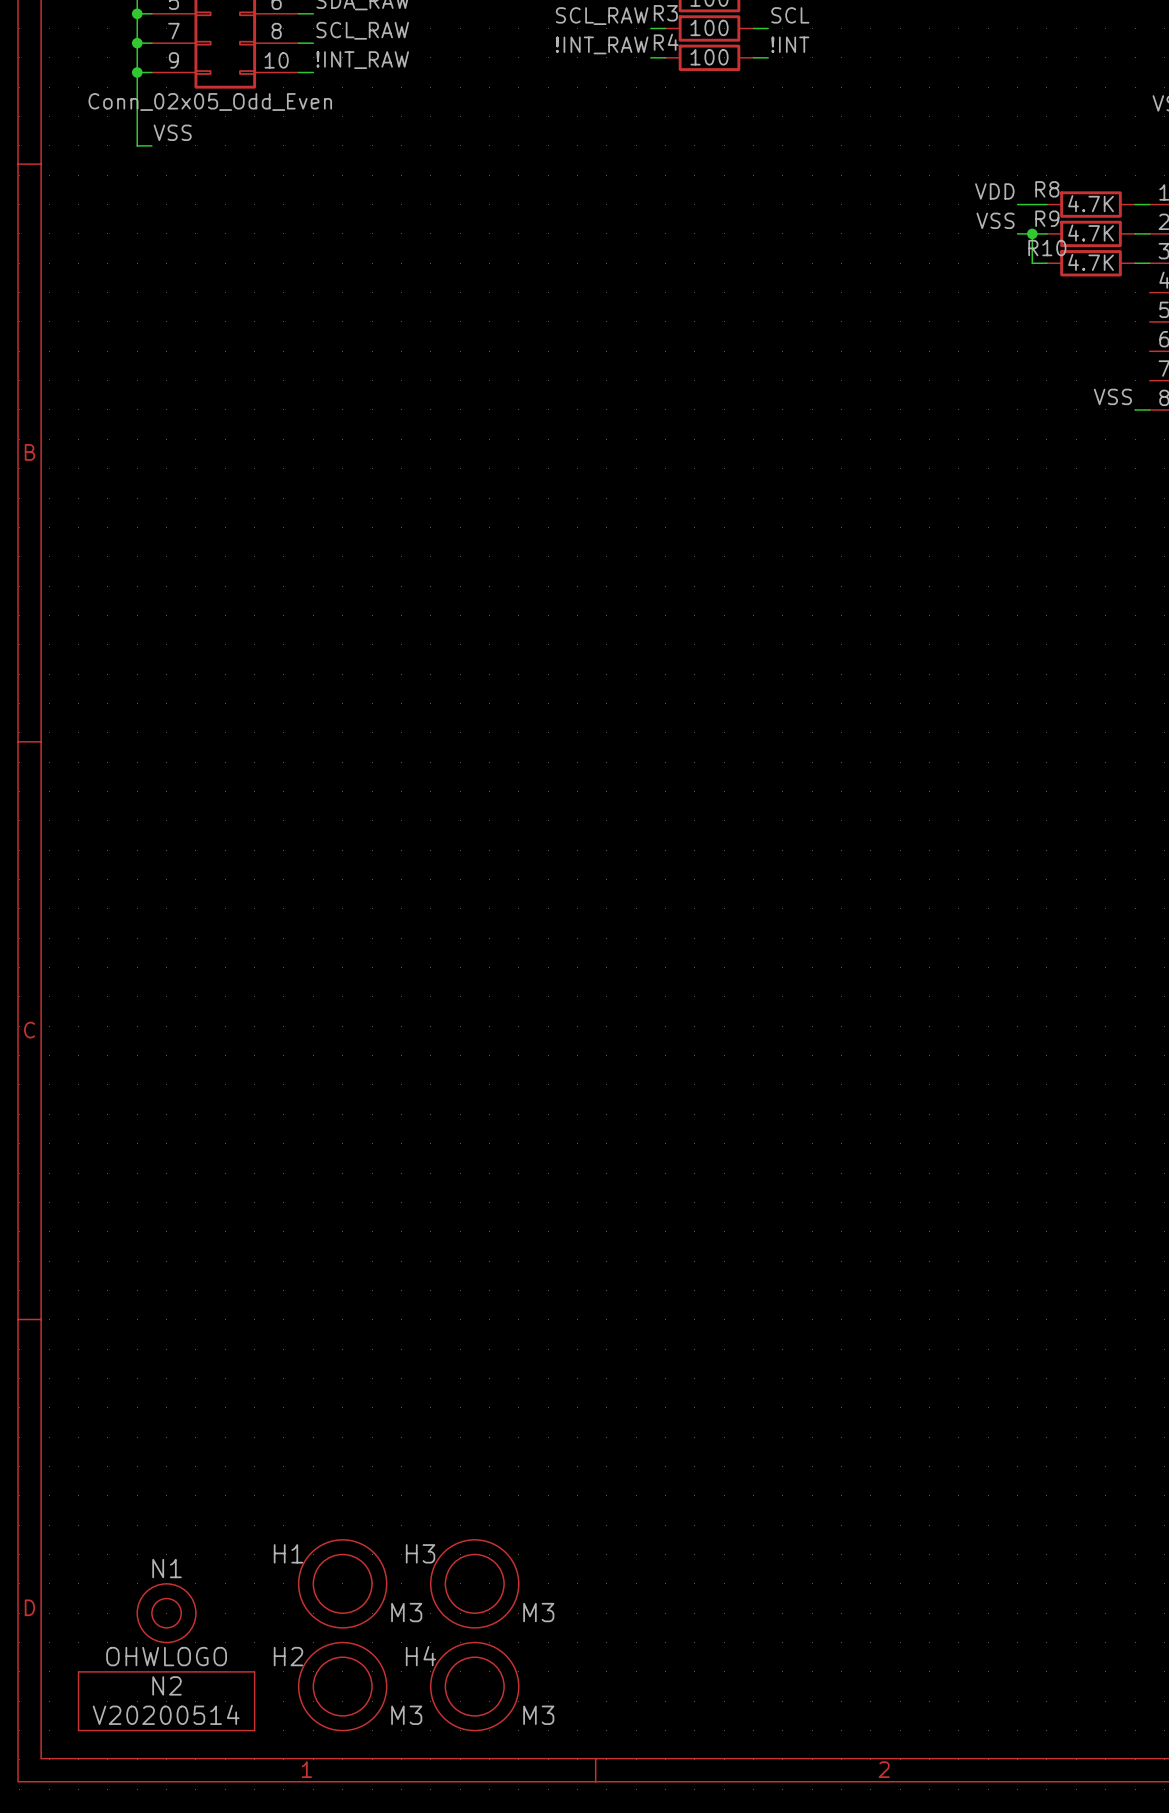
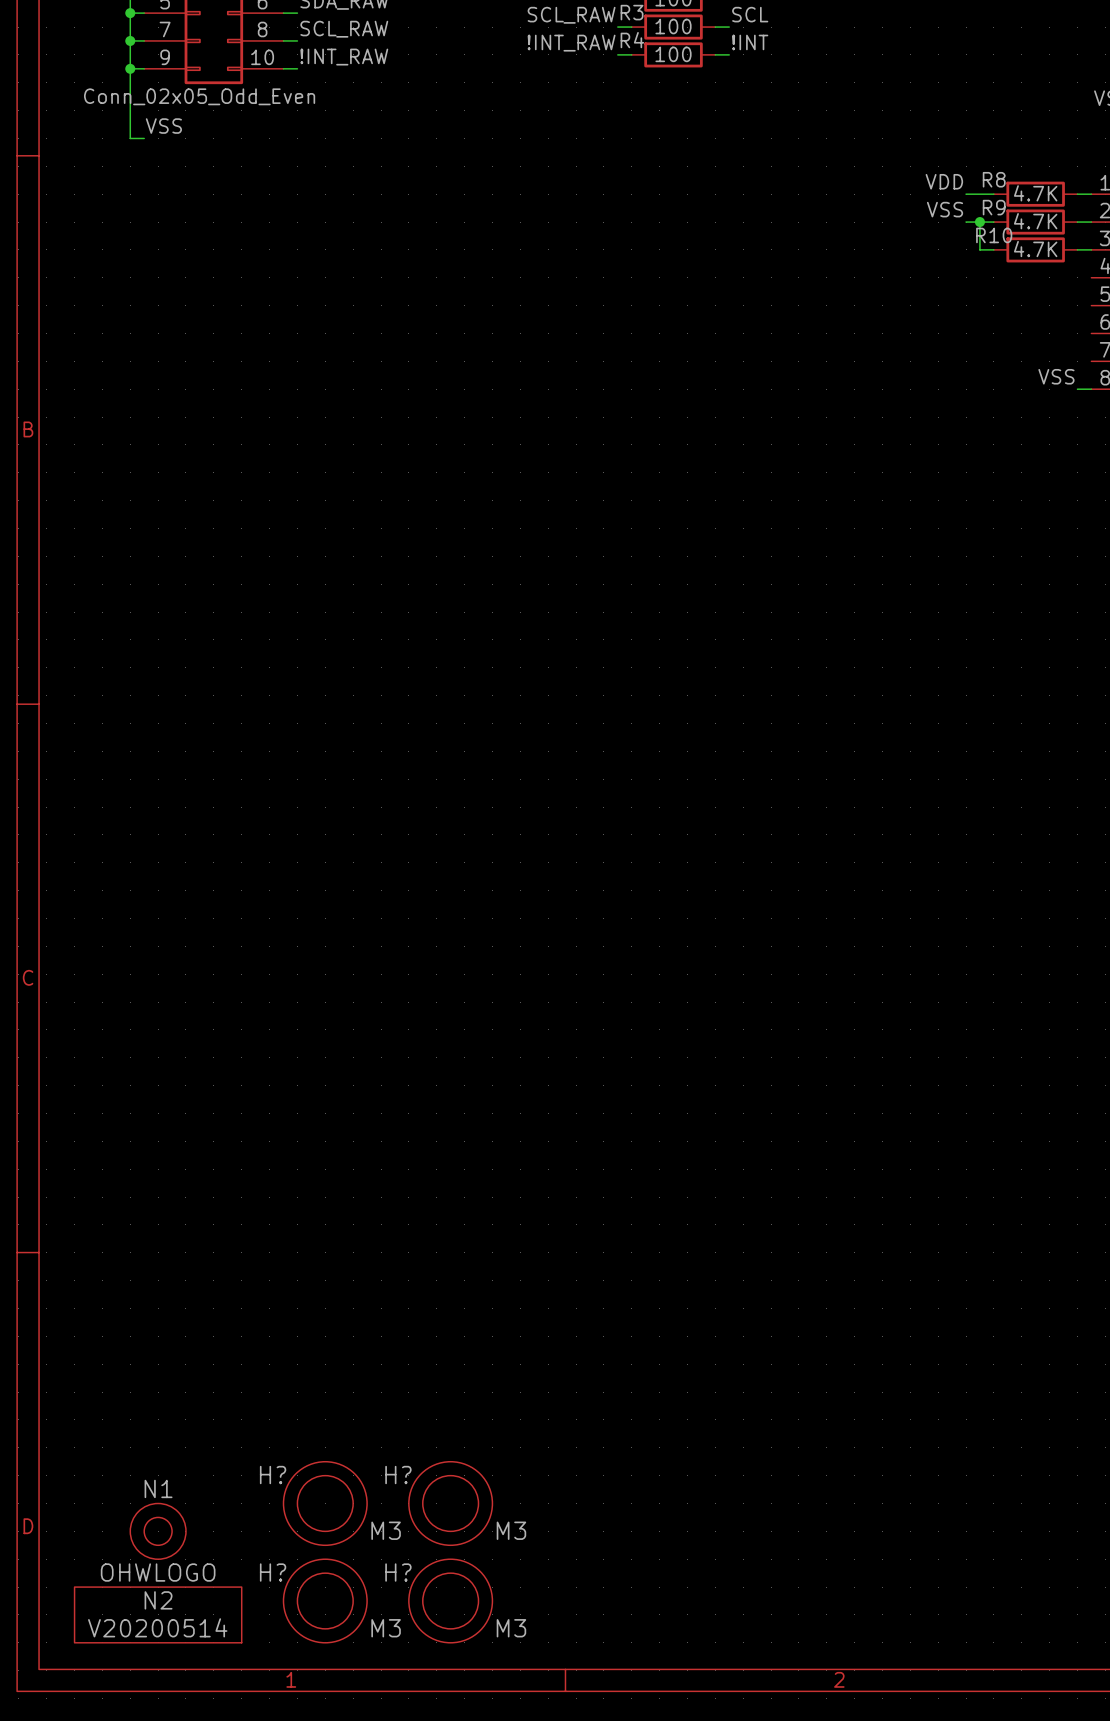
H1 name: H1 (288, 1553) -> H? (273, 1475)
H3 name: H3 (420, 1553) -> H? (398, 1475)
H2 name: H2 (288, 1656) -> H? (273, 1572)
H4 name: H4 (420, 1656) -> H? (398, 1572)

